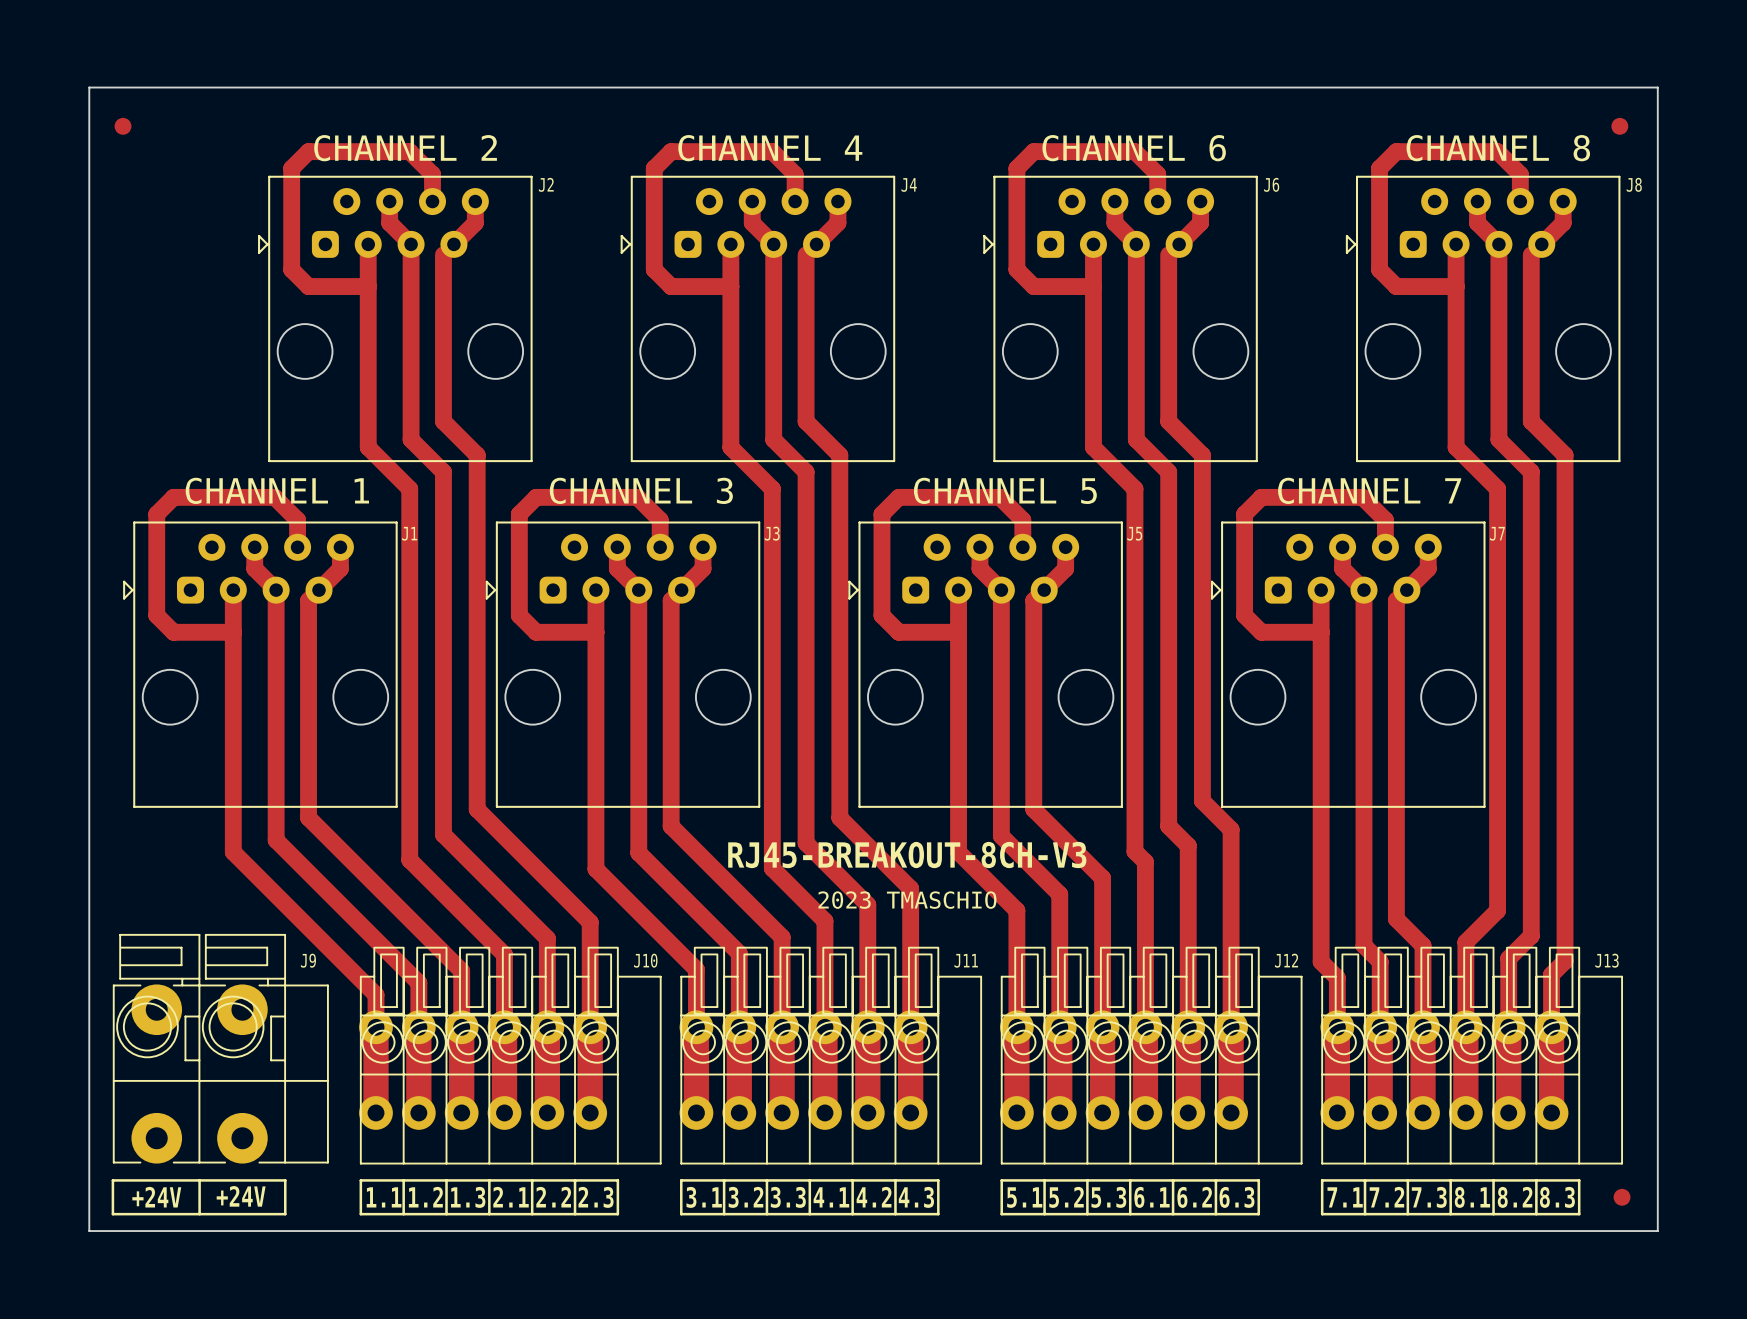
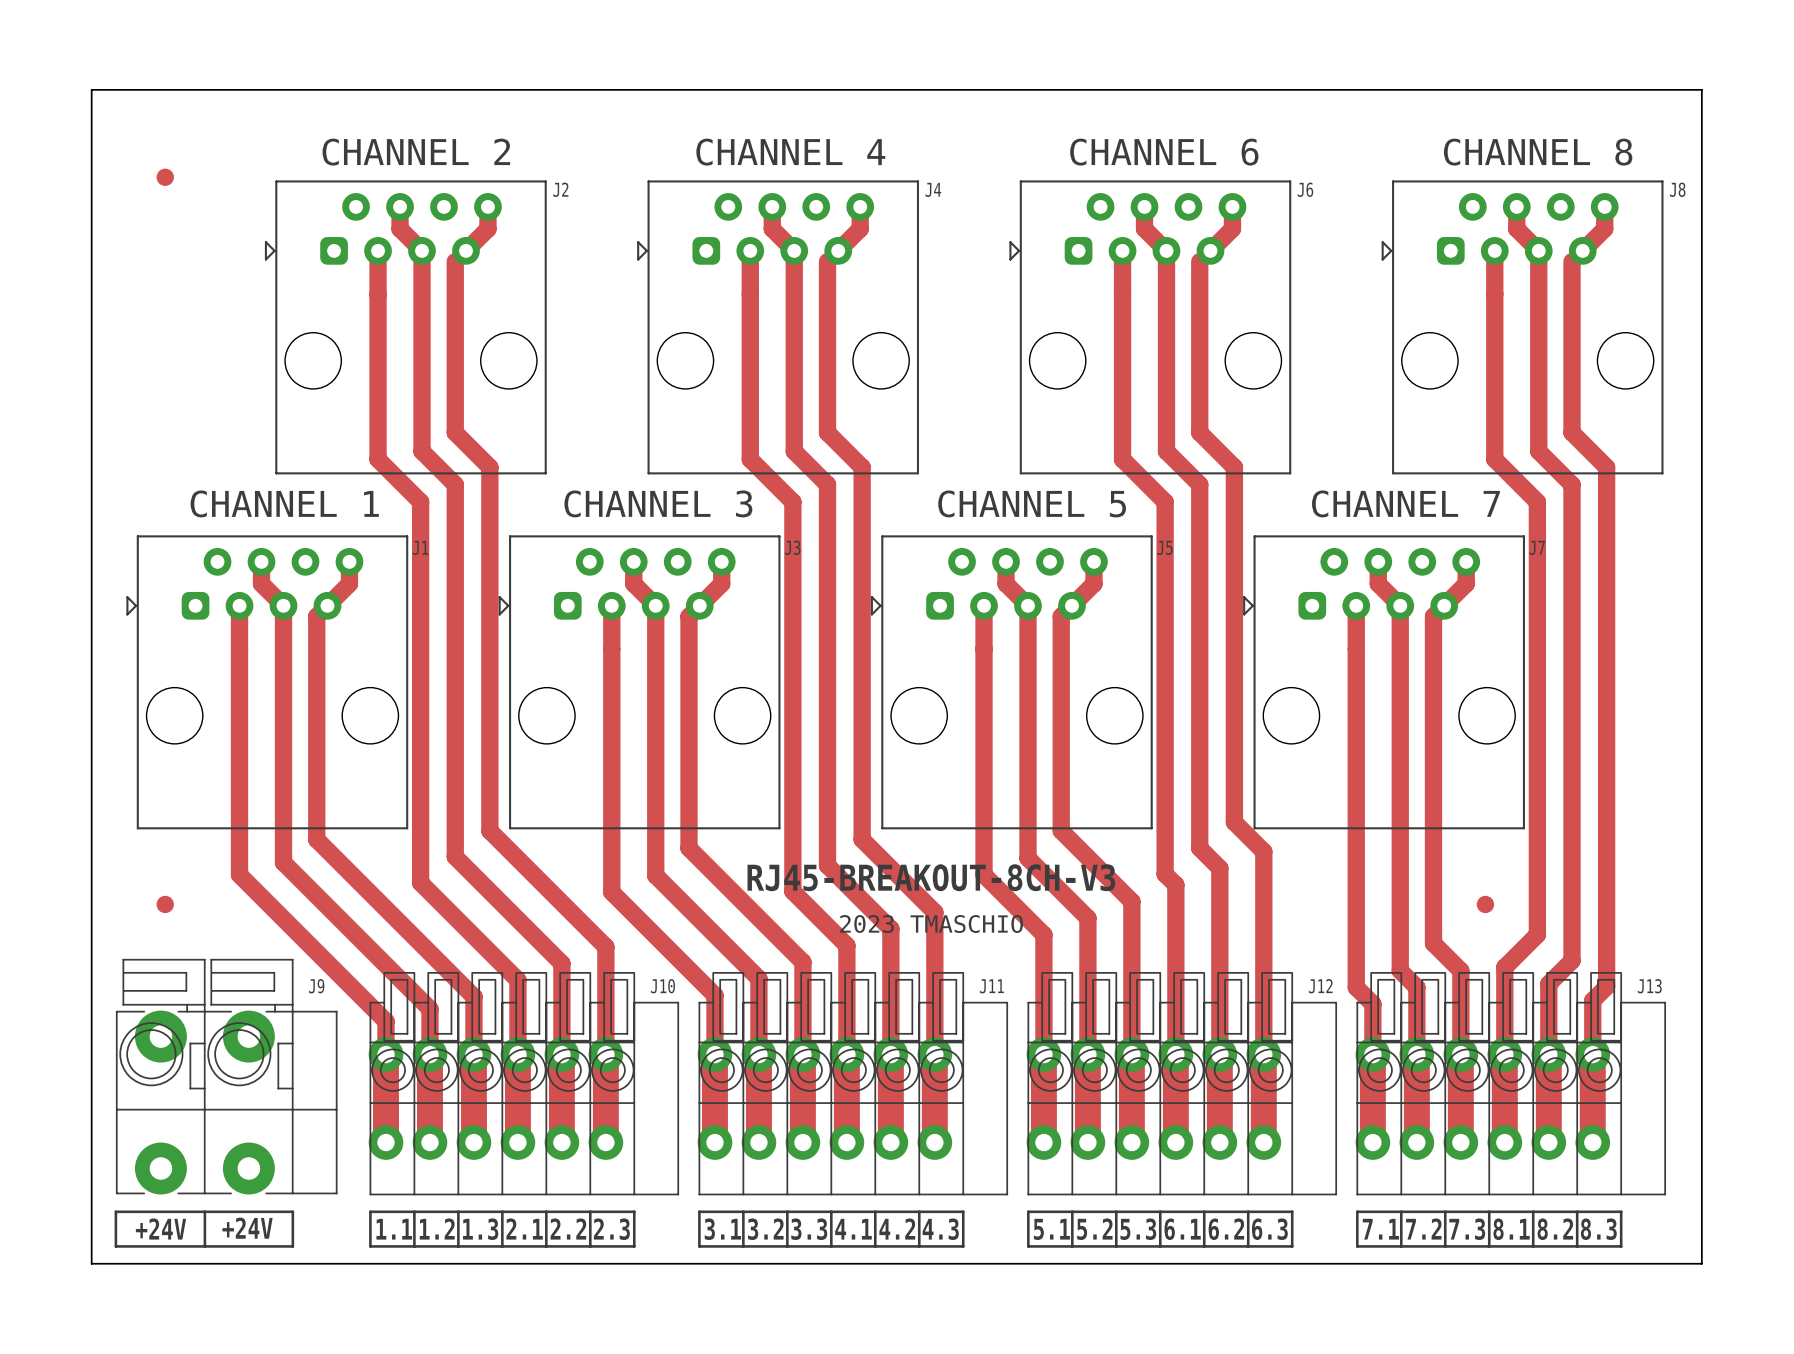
part position: (123, 126) -> (165, 177)
part: (1619, 126) -> none
track: (432, 201) (432, 174) (409, 151) (308, 151) (291, 168) (291, 269) (308, 286) (368, 286) -> none
track: (795, 201) (795, 174) (772, 151) (671, 151) (654, 168) (654, 269) (671, 286) (730, 286) -> none
track: (1157, 201) (1157, 174) (1134, 151) (1033, 151) (1016, 168) (1016, 269) (1033, 286) (1093, 286) -> none
track: (1520, 201) (1520, 174) (1497, 151) (1396, 151) (1379, 168) (1379, 269) (1396, 286) (1456, 286) -> none
track: (297, 547) (297, 520) (274, 497) (173, 497) (156, 514) (156, 615) (173, 632) (233, 632) -> none
track: (660, 547) (660, 520) (637, 497) (536, 497) (519, 514) (519, 615) (536, 632) (595, 632) -> none
track: (1022, 547) (1022, 520) (1000, 497) (898, 497) (881, 514) (881, 615) (898, 632) (958, 632) -> none
track: (1385, 547) (1385, 520) (1362, 497) (1261, 497) (1244, 514) (1244, 615) (1261, 632) (1321, 632) -> none
part: none -> (165, 904)
part position: (1622, 1197) -> (1485, 904)

